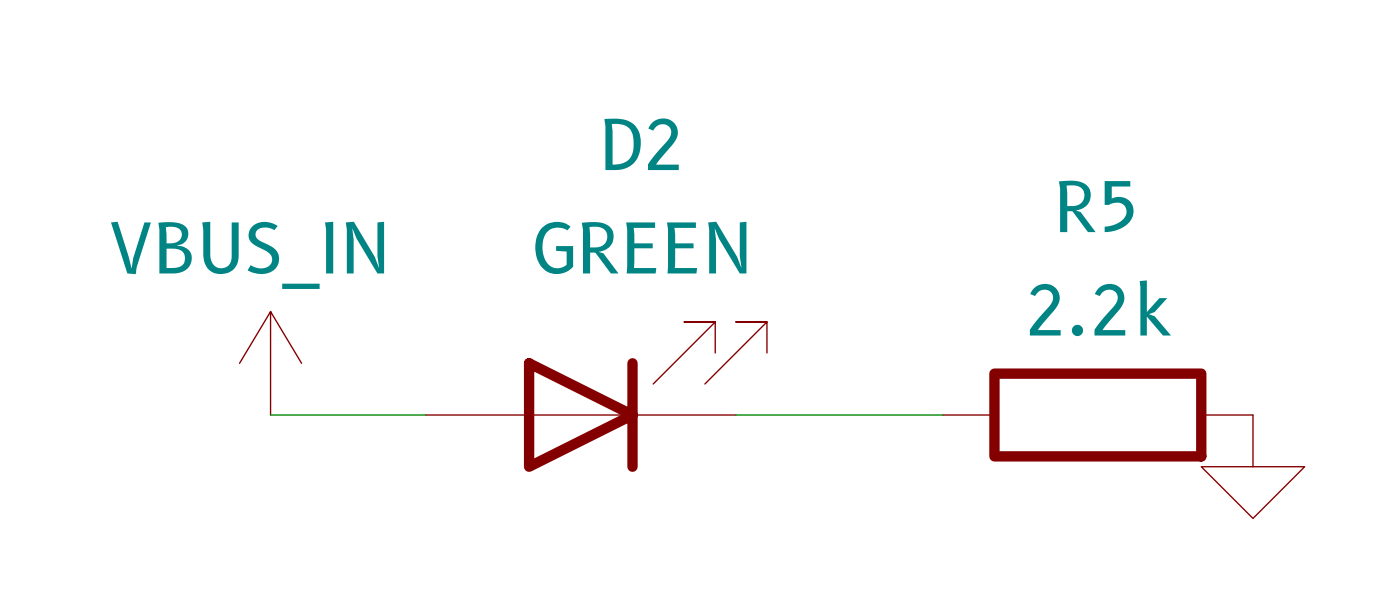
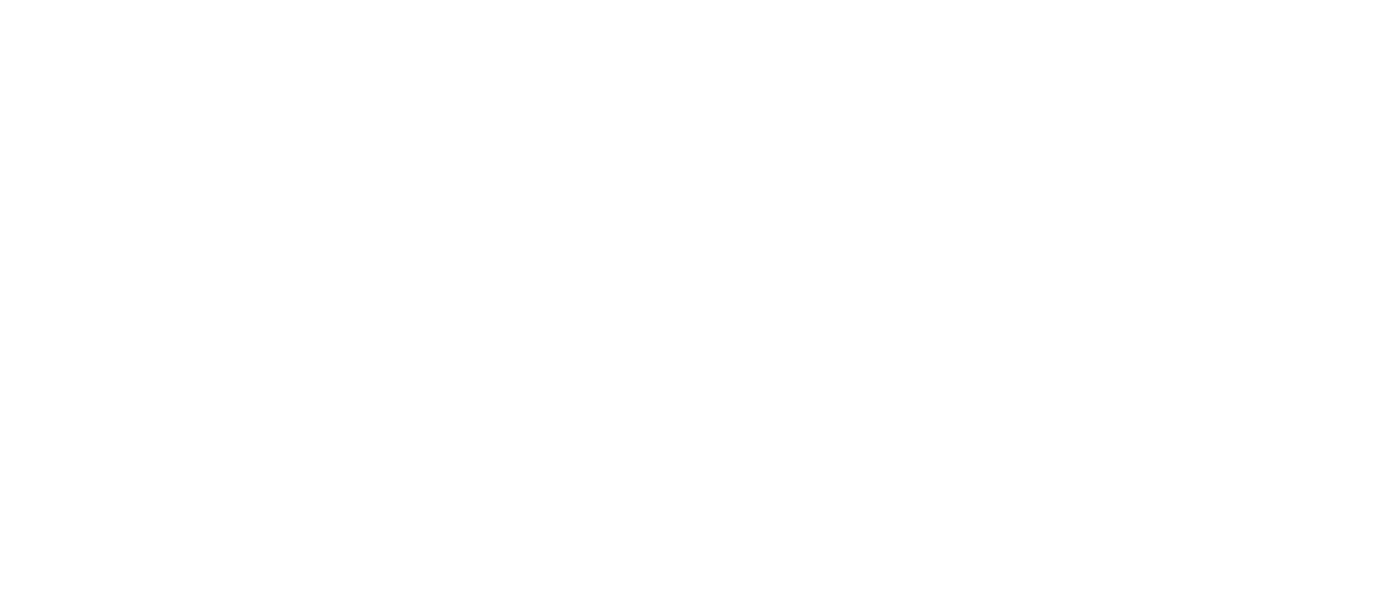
power symbol: VBUS_IN (270, 363) -> none
D2: GREEN (596, 396) -> none
wire: (270, 415) (425, 415) -> none
wire: (735, 415) (942, 415) -> none
R5: 2.2k (1097, 415) -> none
power symbol: (1252, 466) -> none

